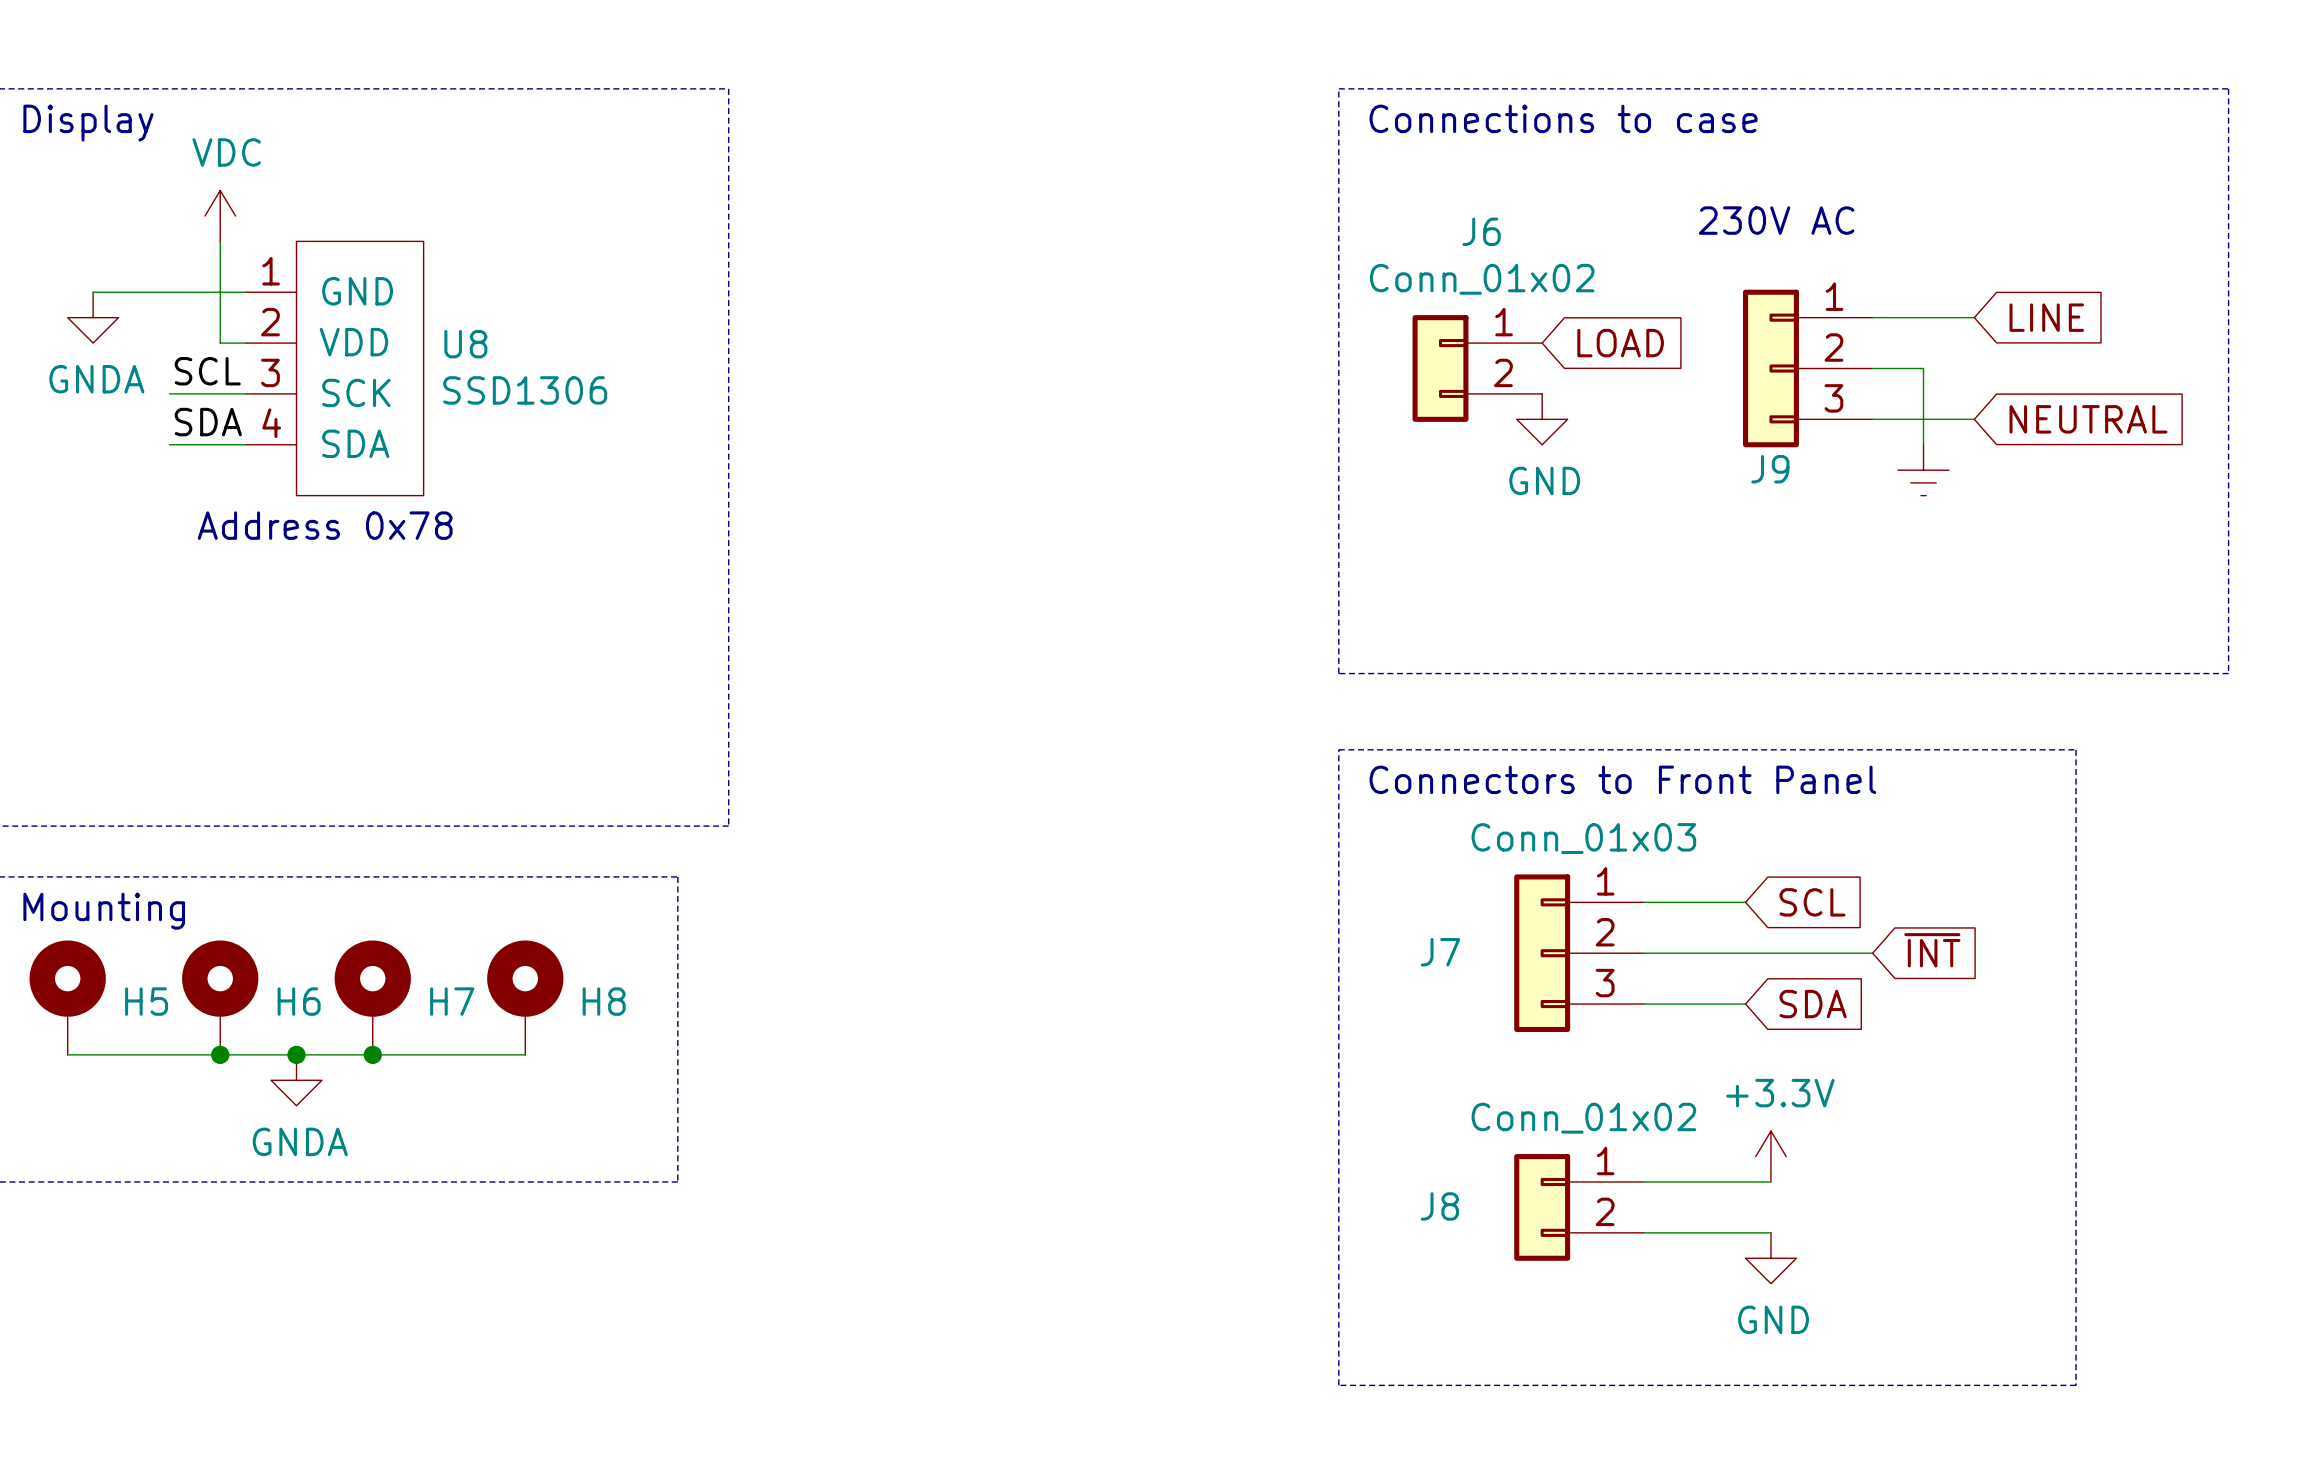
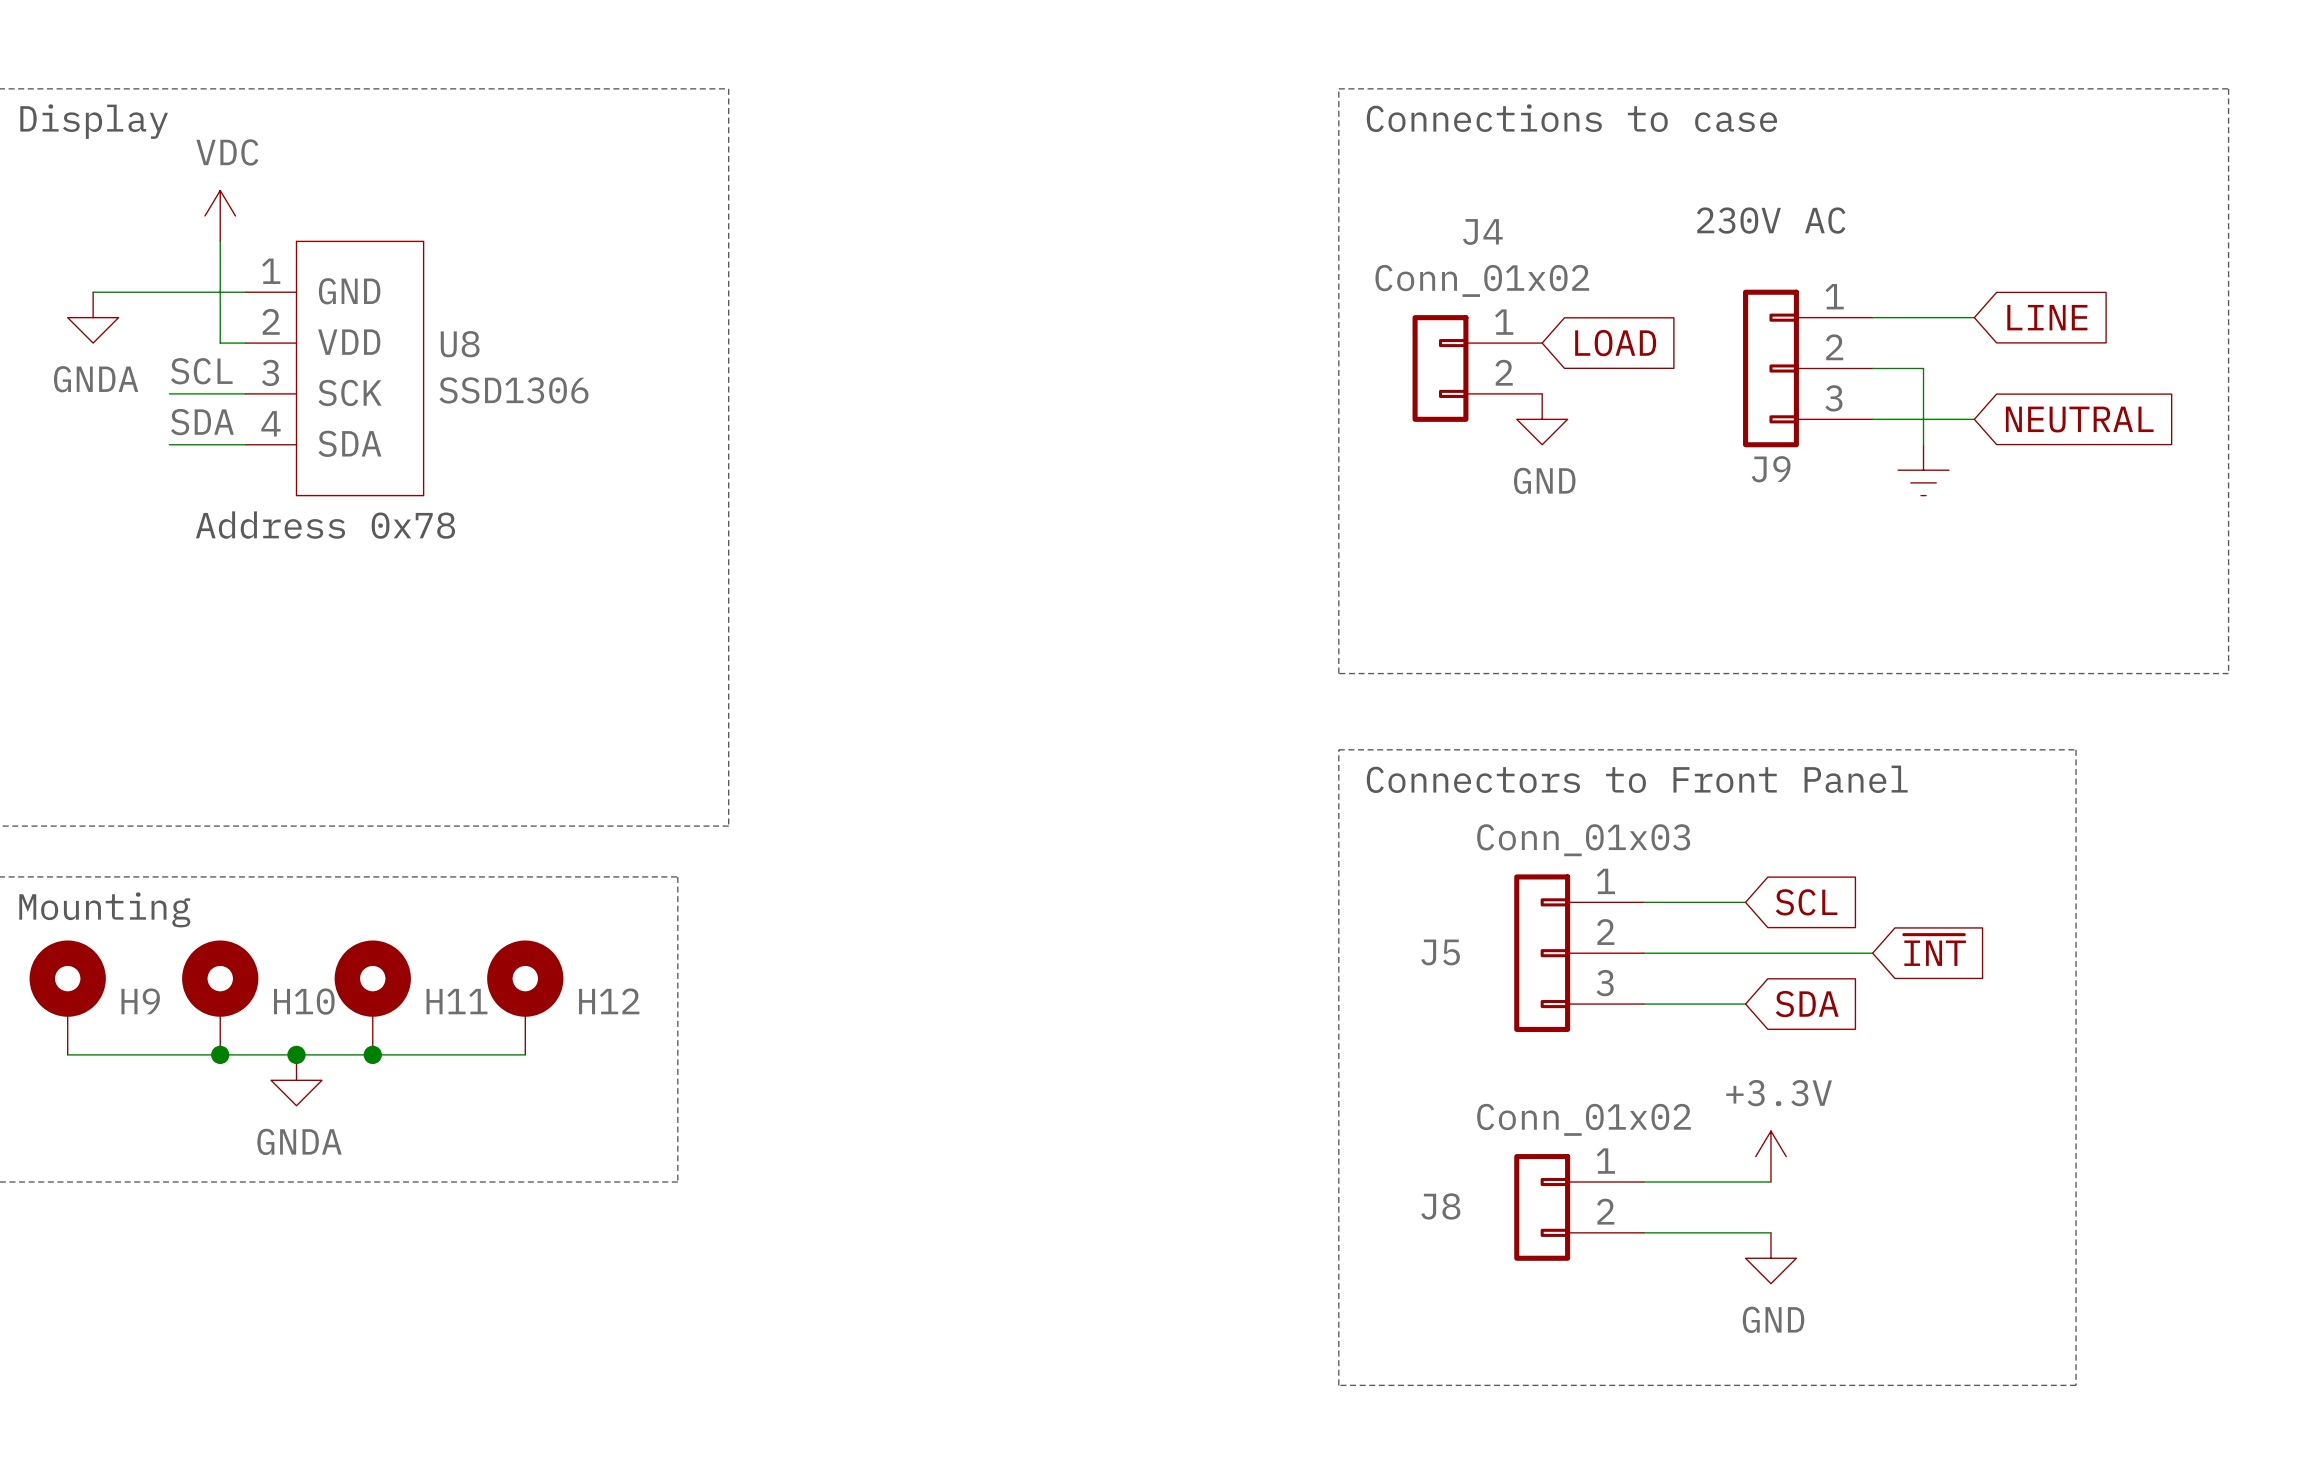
J6 name: J6 (1481, 231) -> J4 (1482, 232)
J7 name: J7 (1440, 952) -> J5 (1440, 952)
H5 name: H5 (146, 1001) -> H9 (140, 1001)
H6 name: H6 (299, 1001) -> H10 (304, 1001)
H7 name: H7 (452, 1001) -> H11 (456, 1001)
H8 name: H8 (604, 1001) -> H12 (609, 1001)

